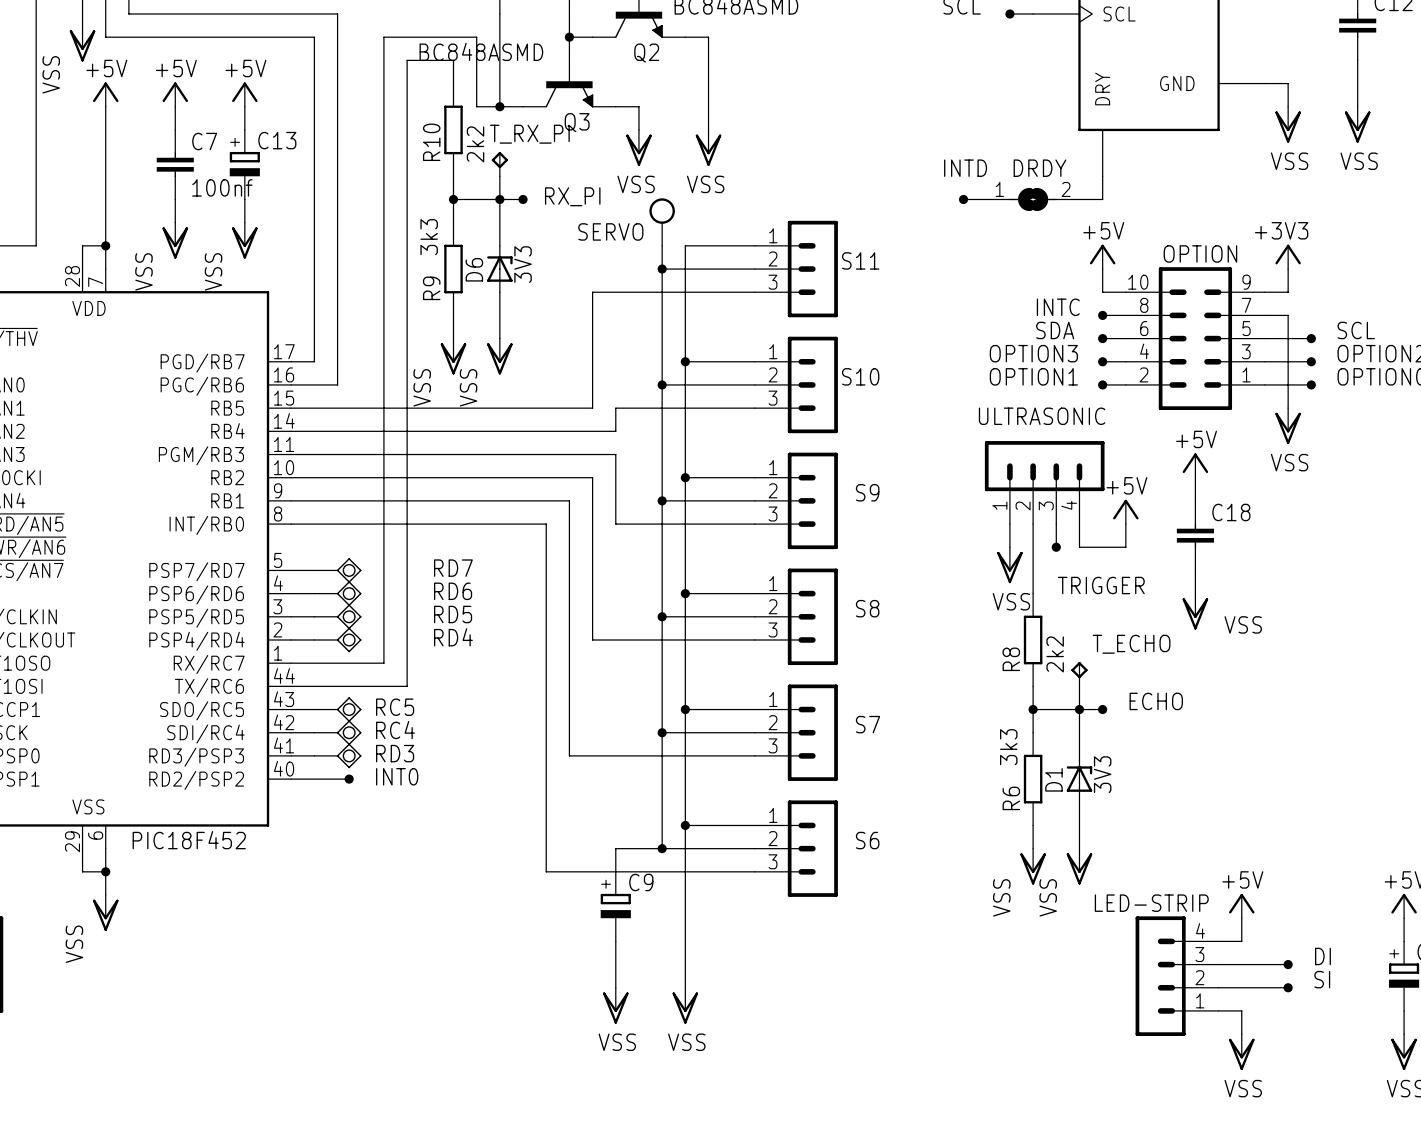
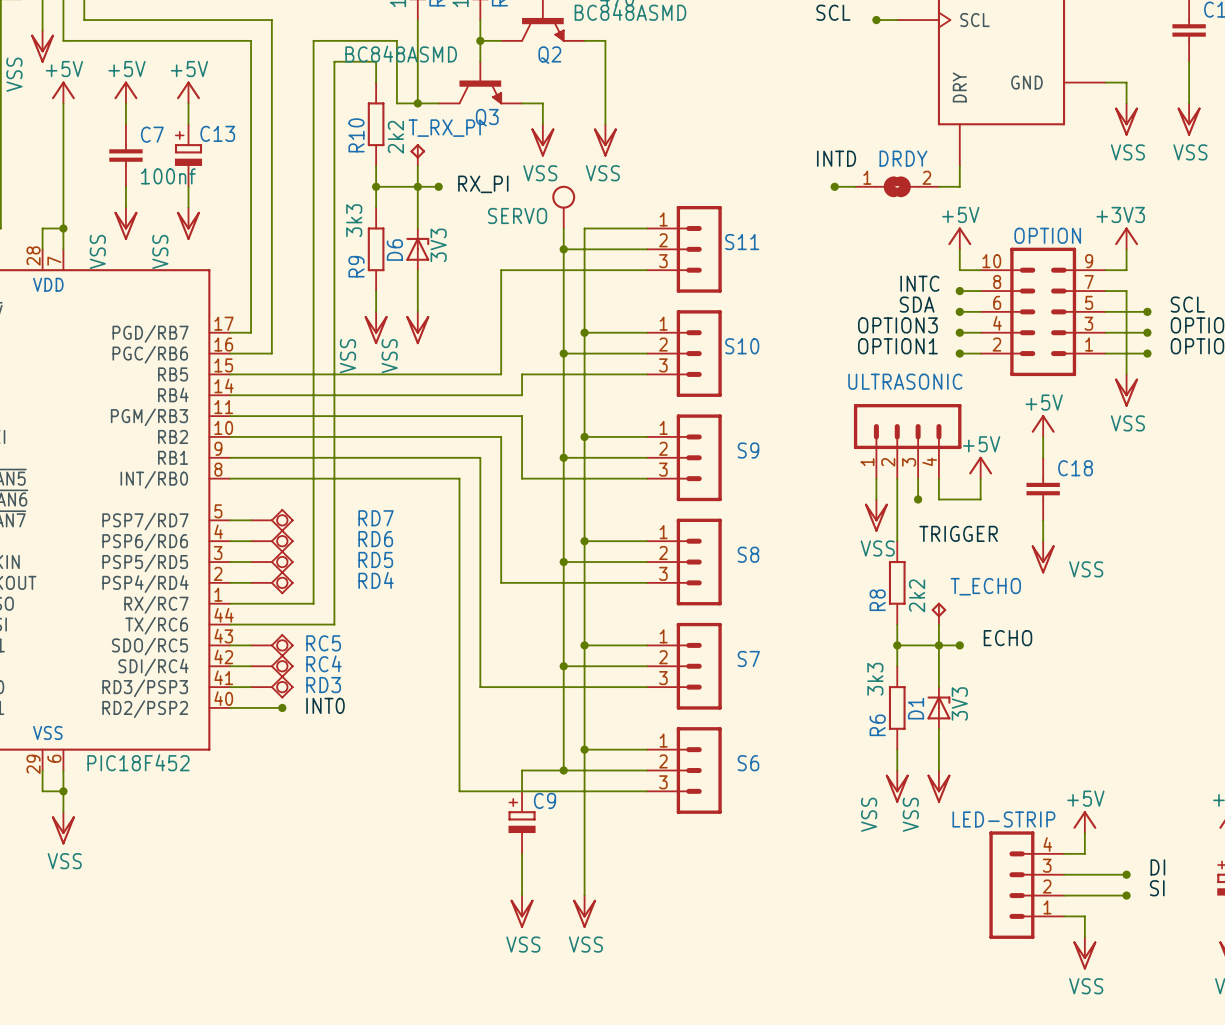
power symbol text rotation: 0° (74, 944) -> 90° clockwise (64, 861)

